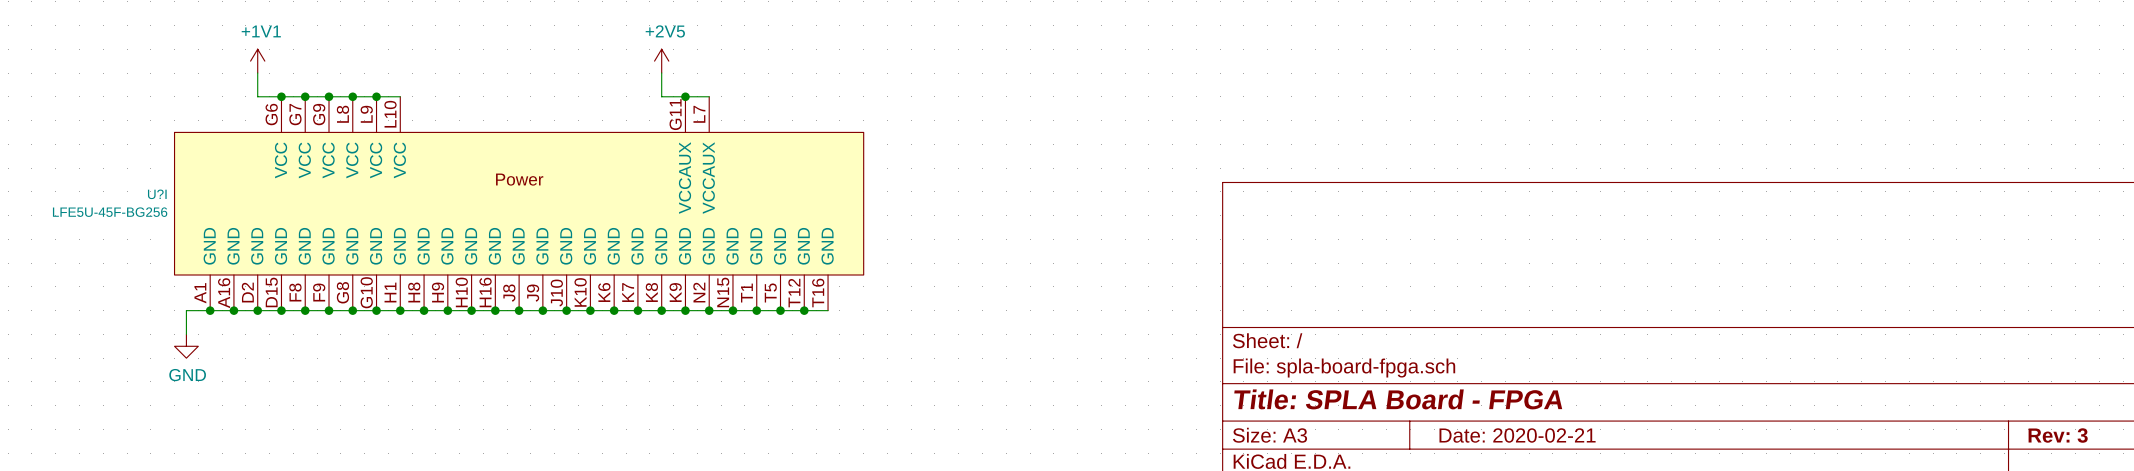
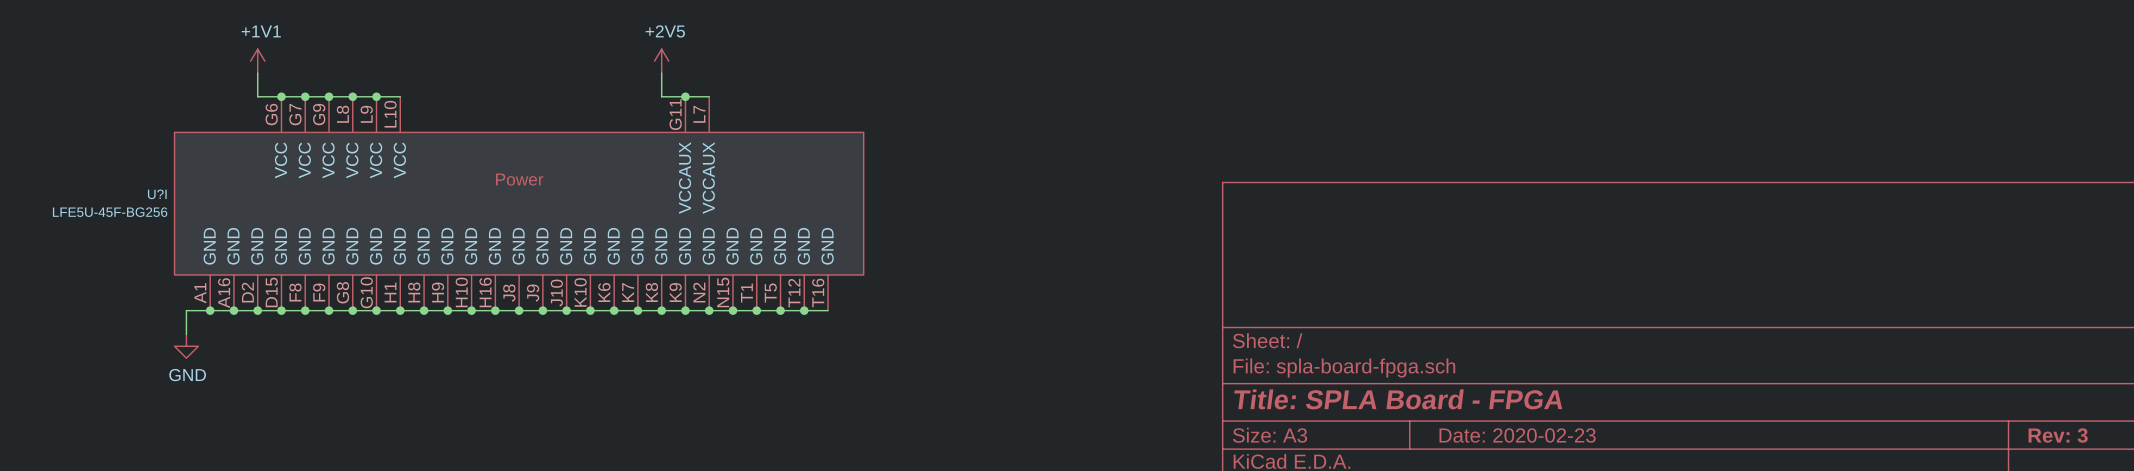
title block: Date: 2020-02-21 (1517, 435) -> Date: 2020-02-23 (1517, 435)

